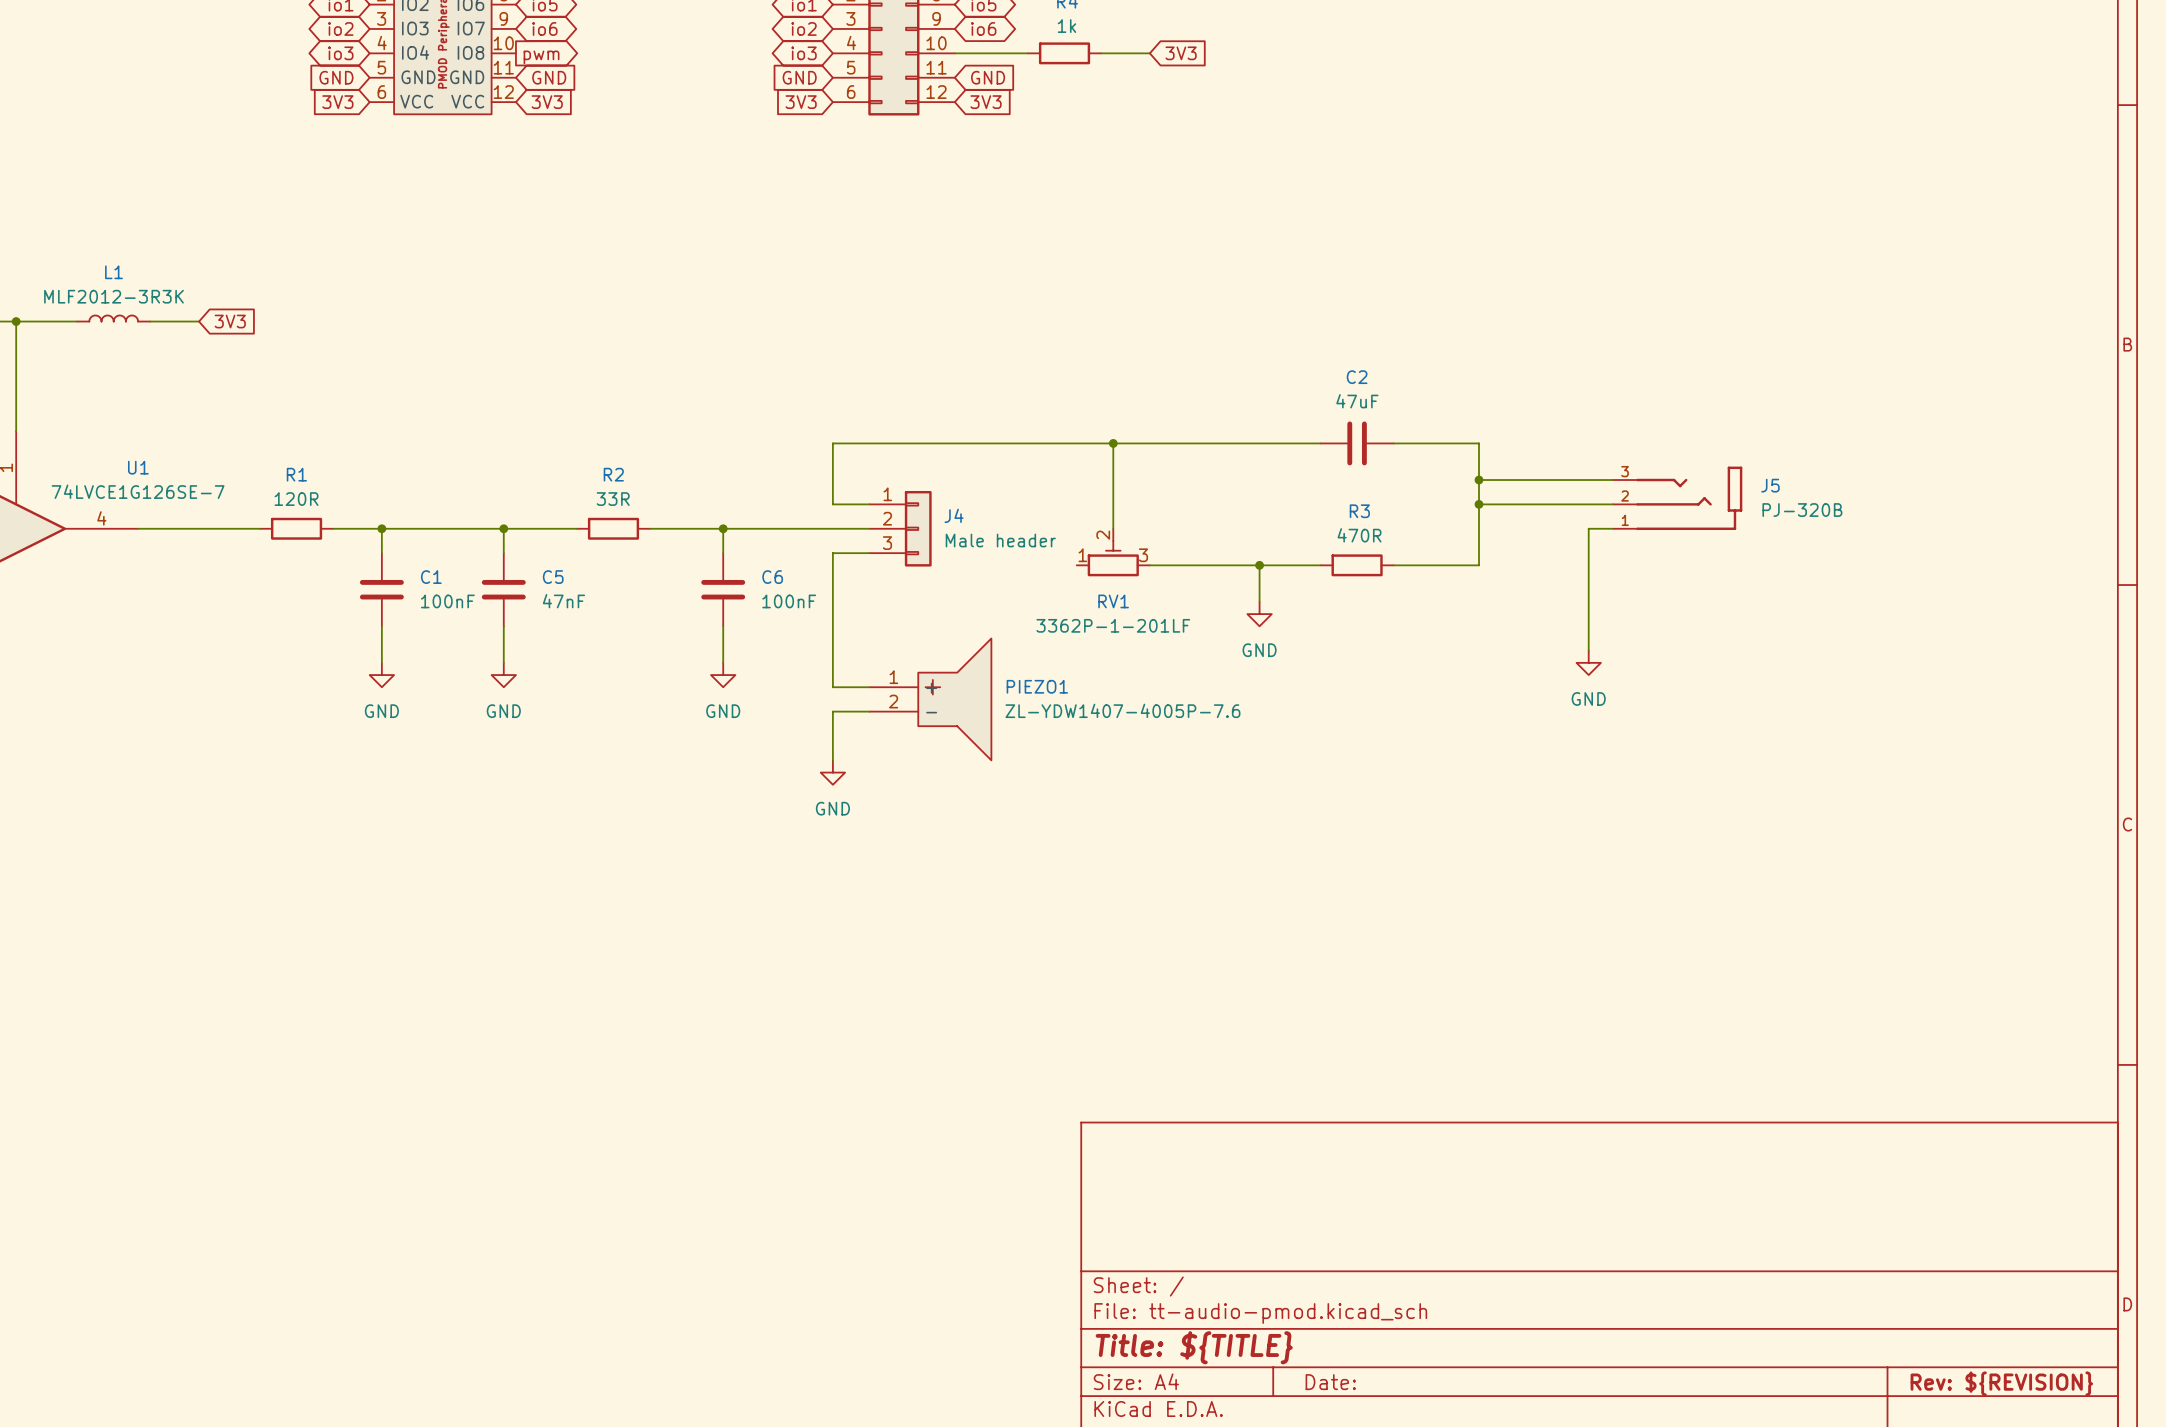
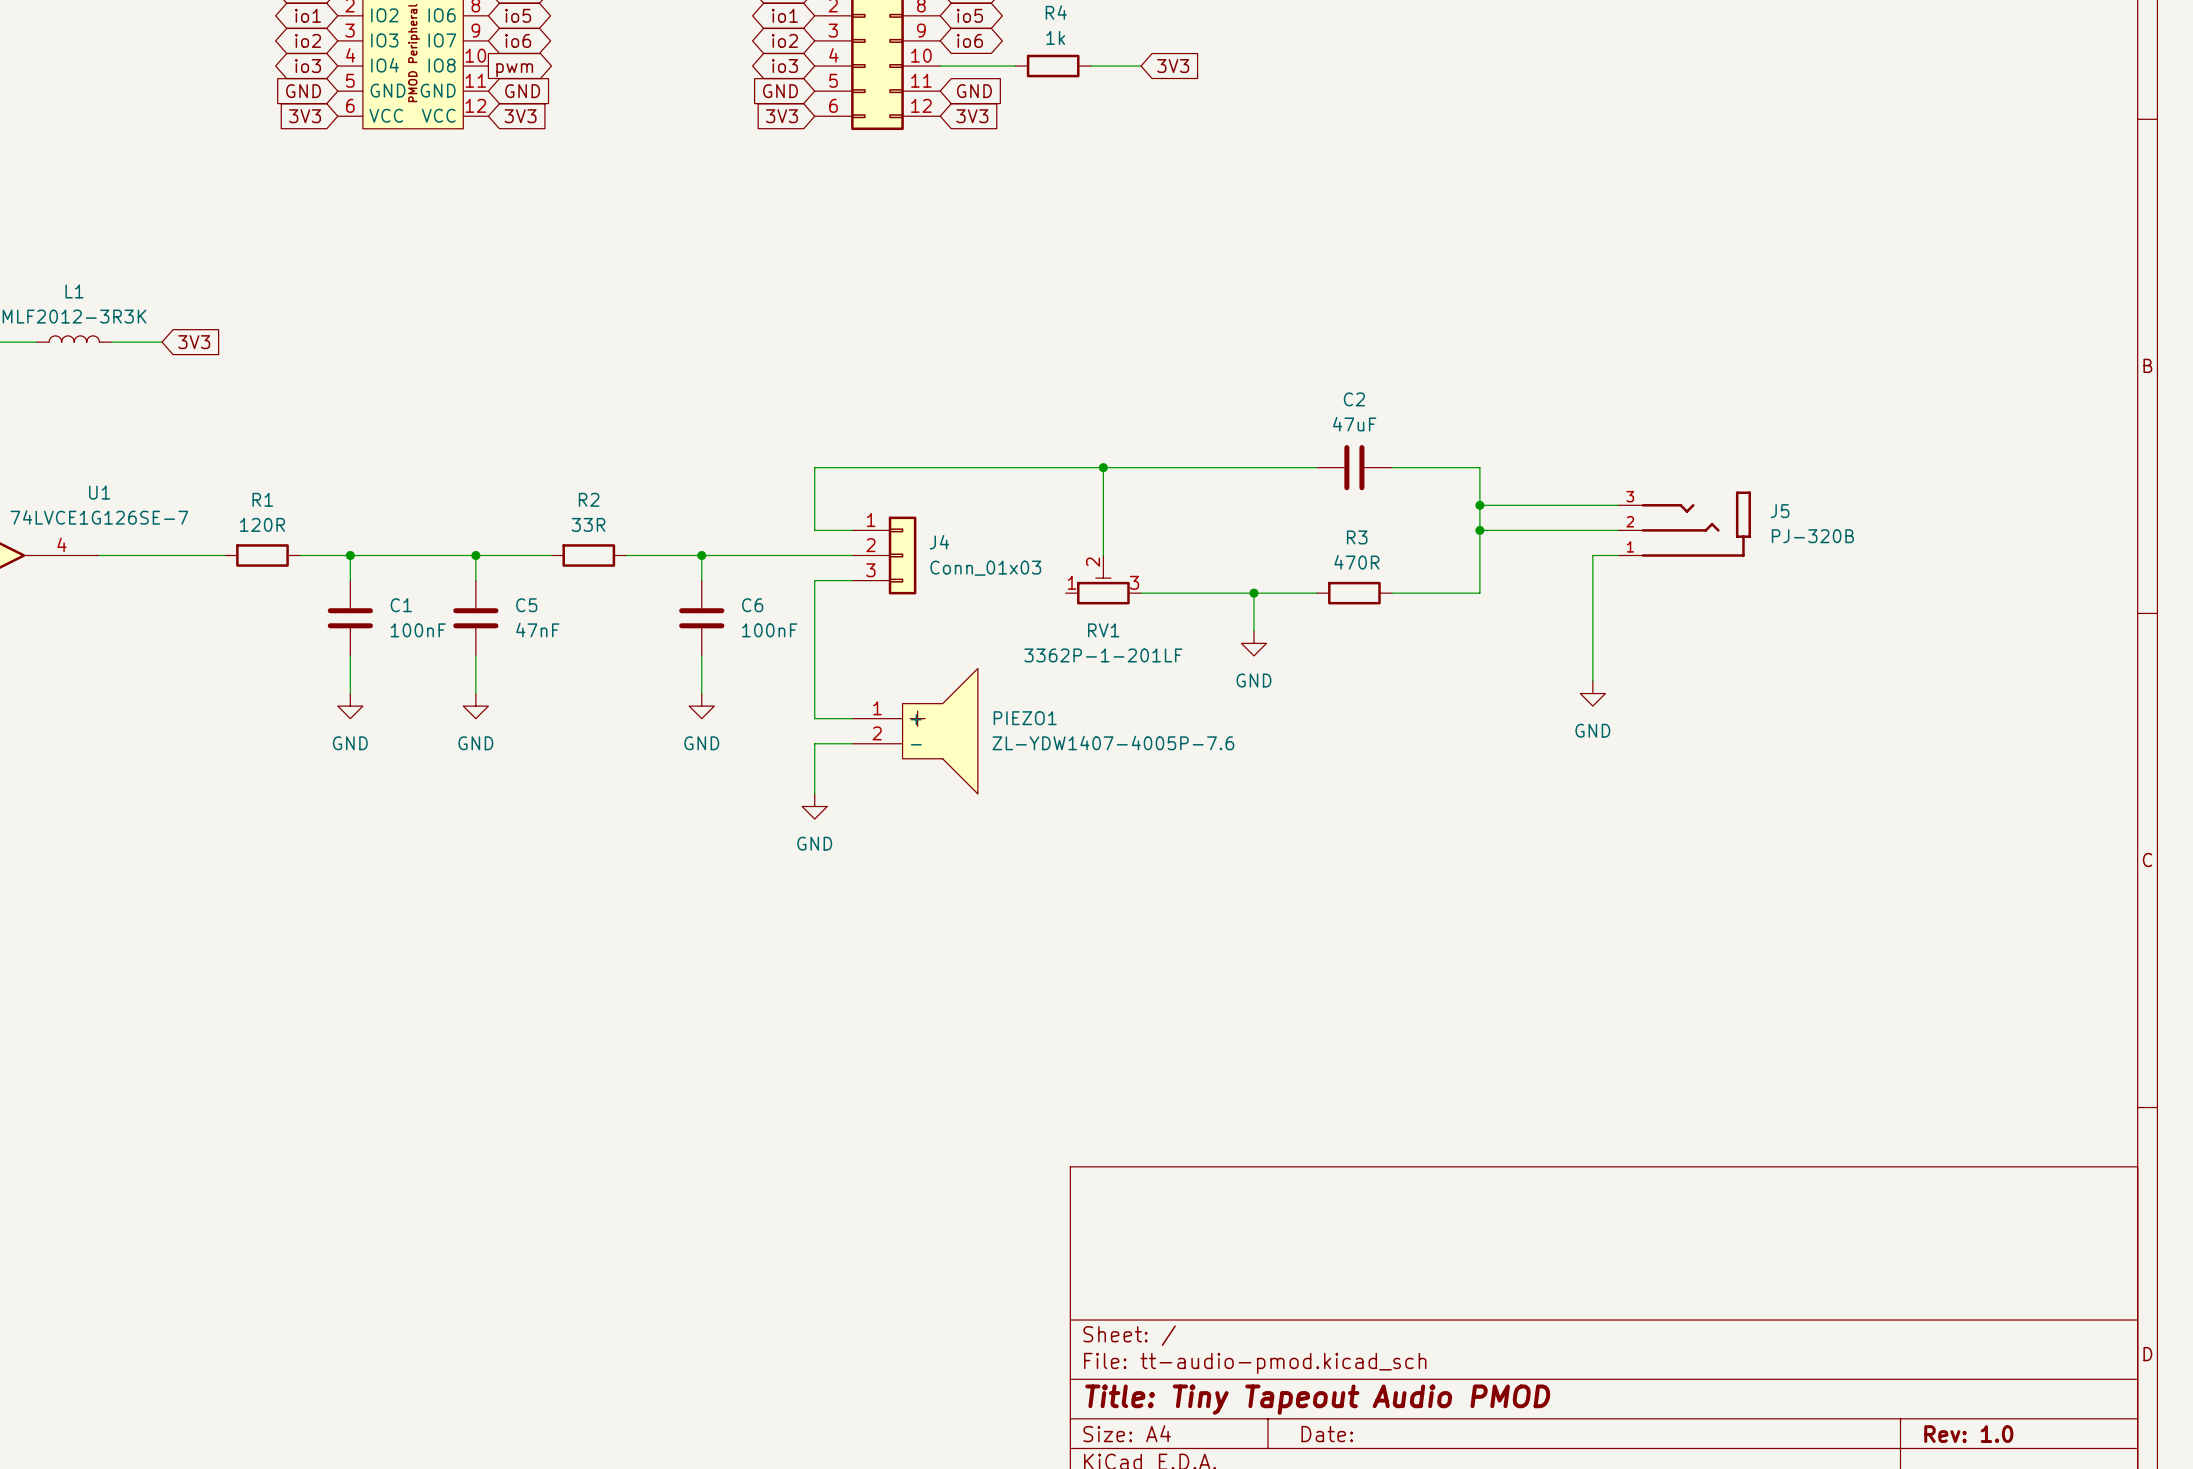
J4 value: Male header (1000, 540) -> Conn_01x03 (985, 568)
title block: Title: ${TITLE} (1194, 1347) -> Title: Tiny Tapeout Audio PMOD (1317, 1399)
title block: Rev: ${REVISION} (2001, 1383) -> Rev: 1.0 (1968, 1434)

